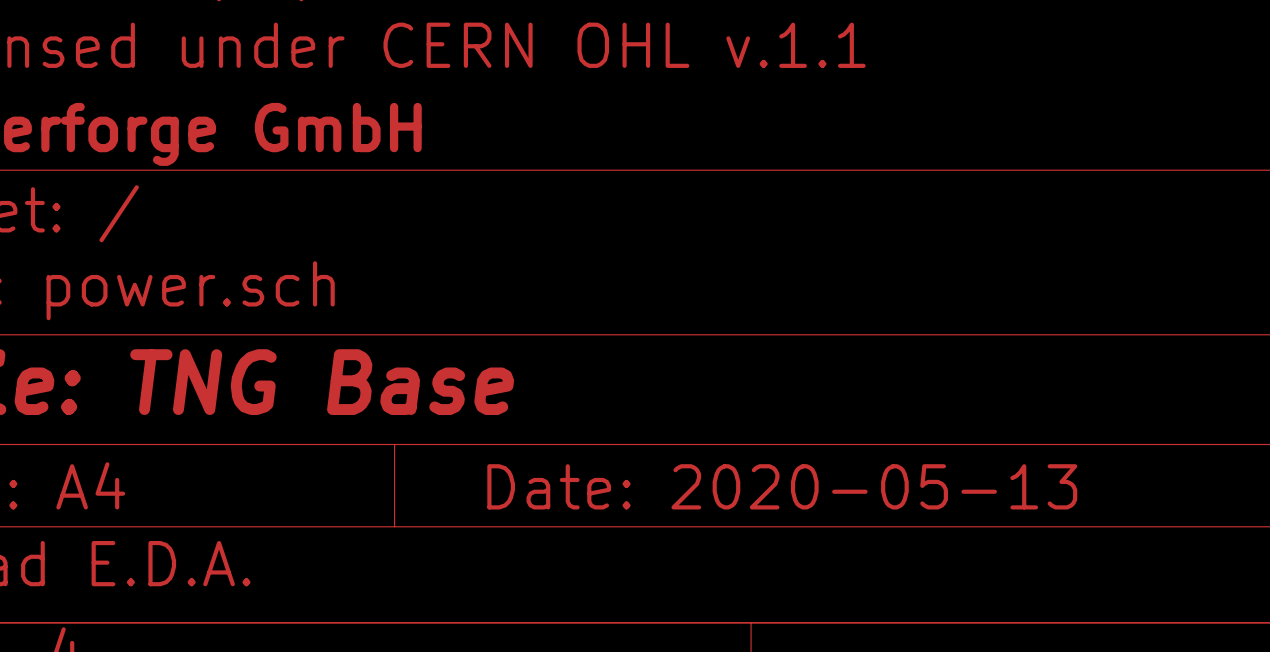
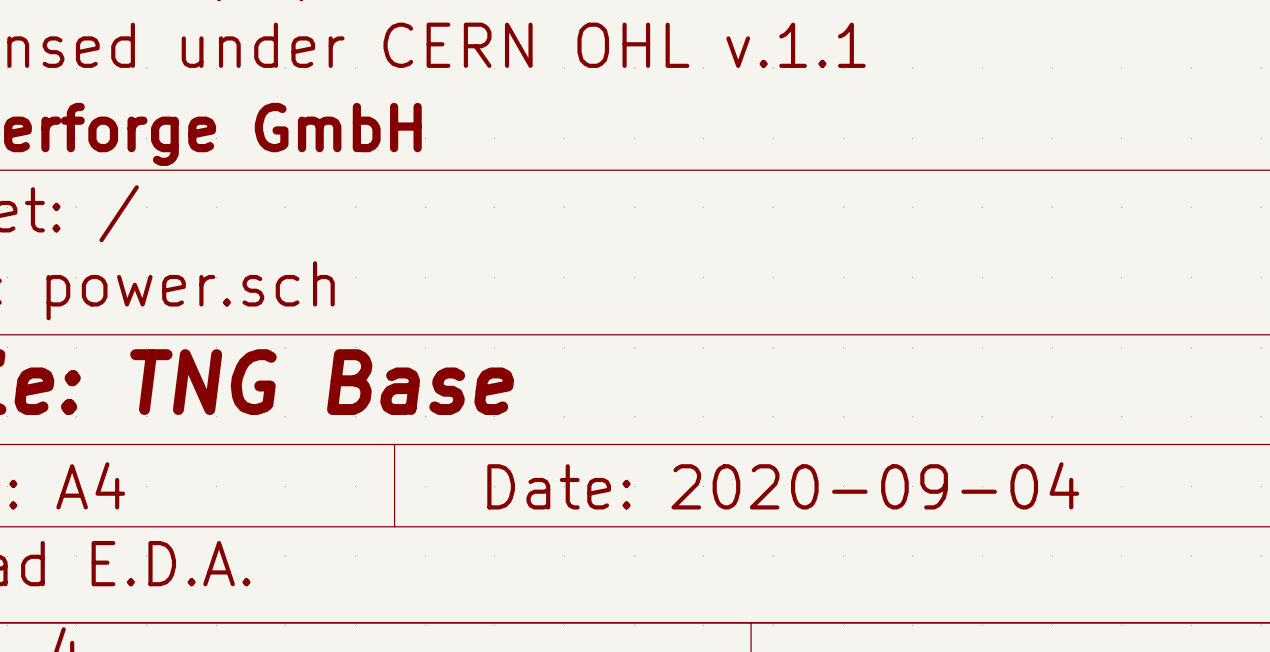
title block: Date: 2020-05-13 (782, 486) -> Date: 2020-09-04 (783, 485)

